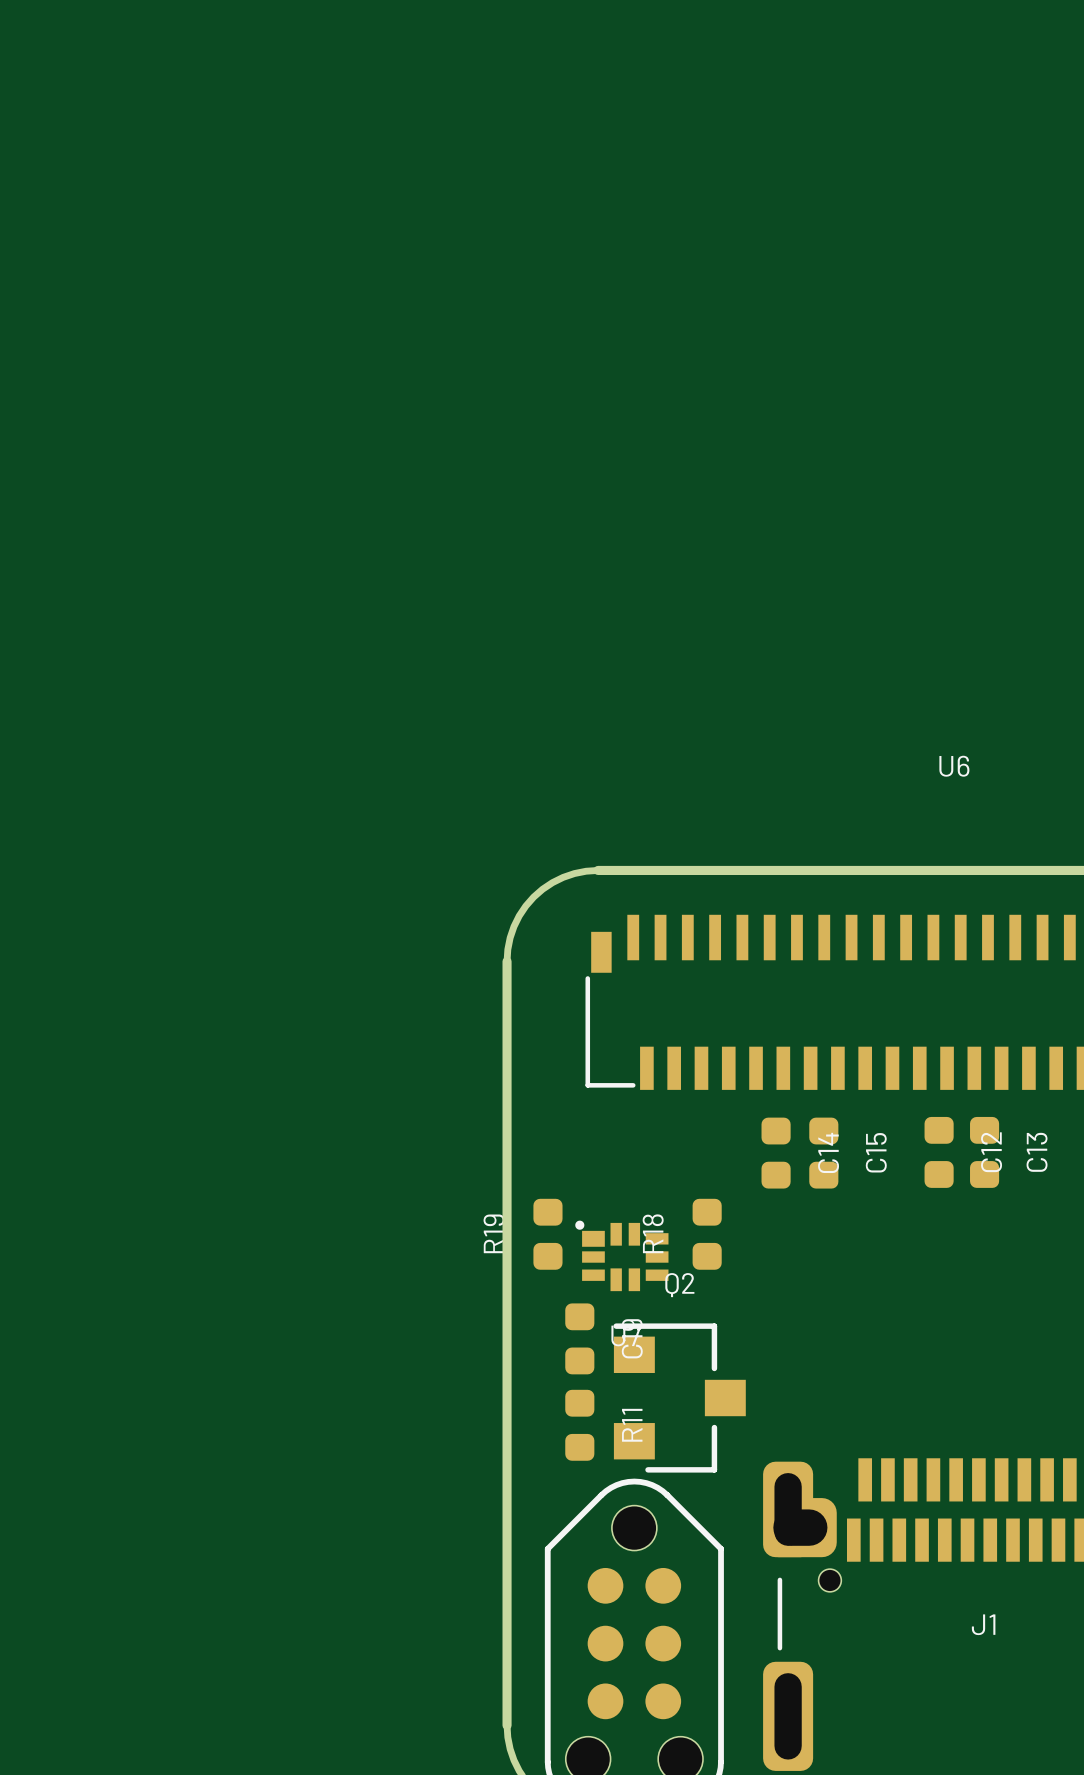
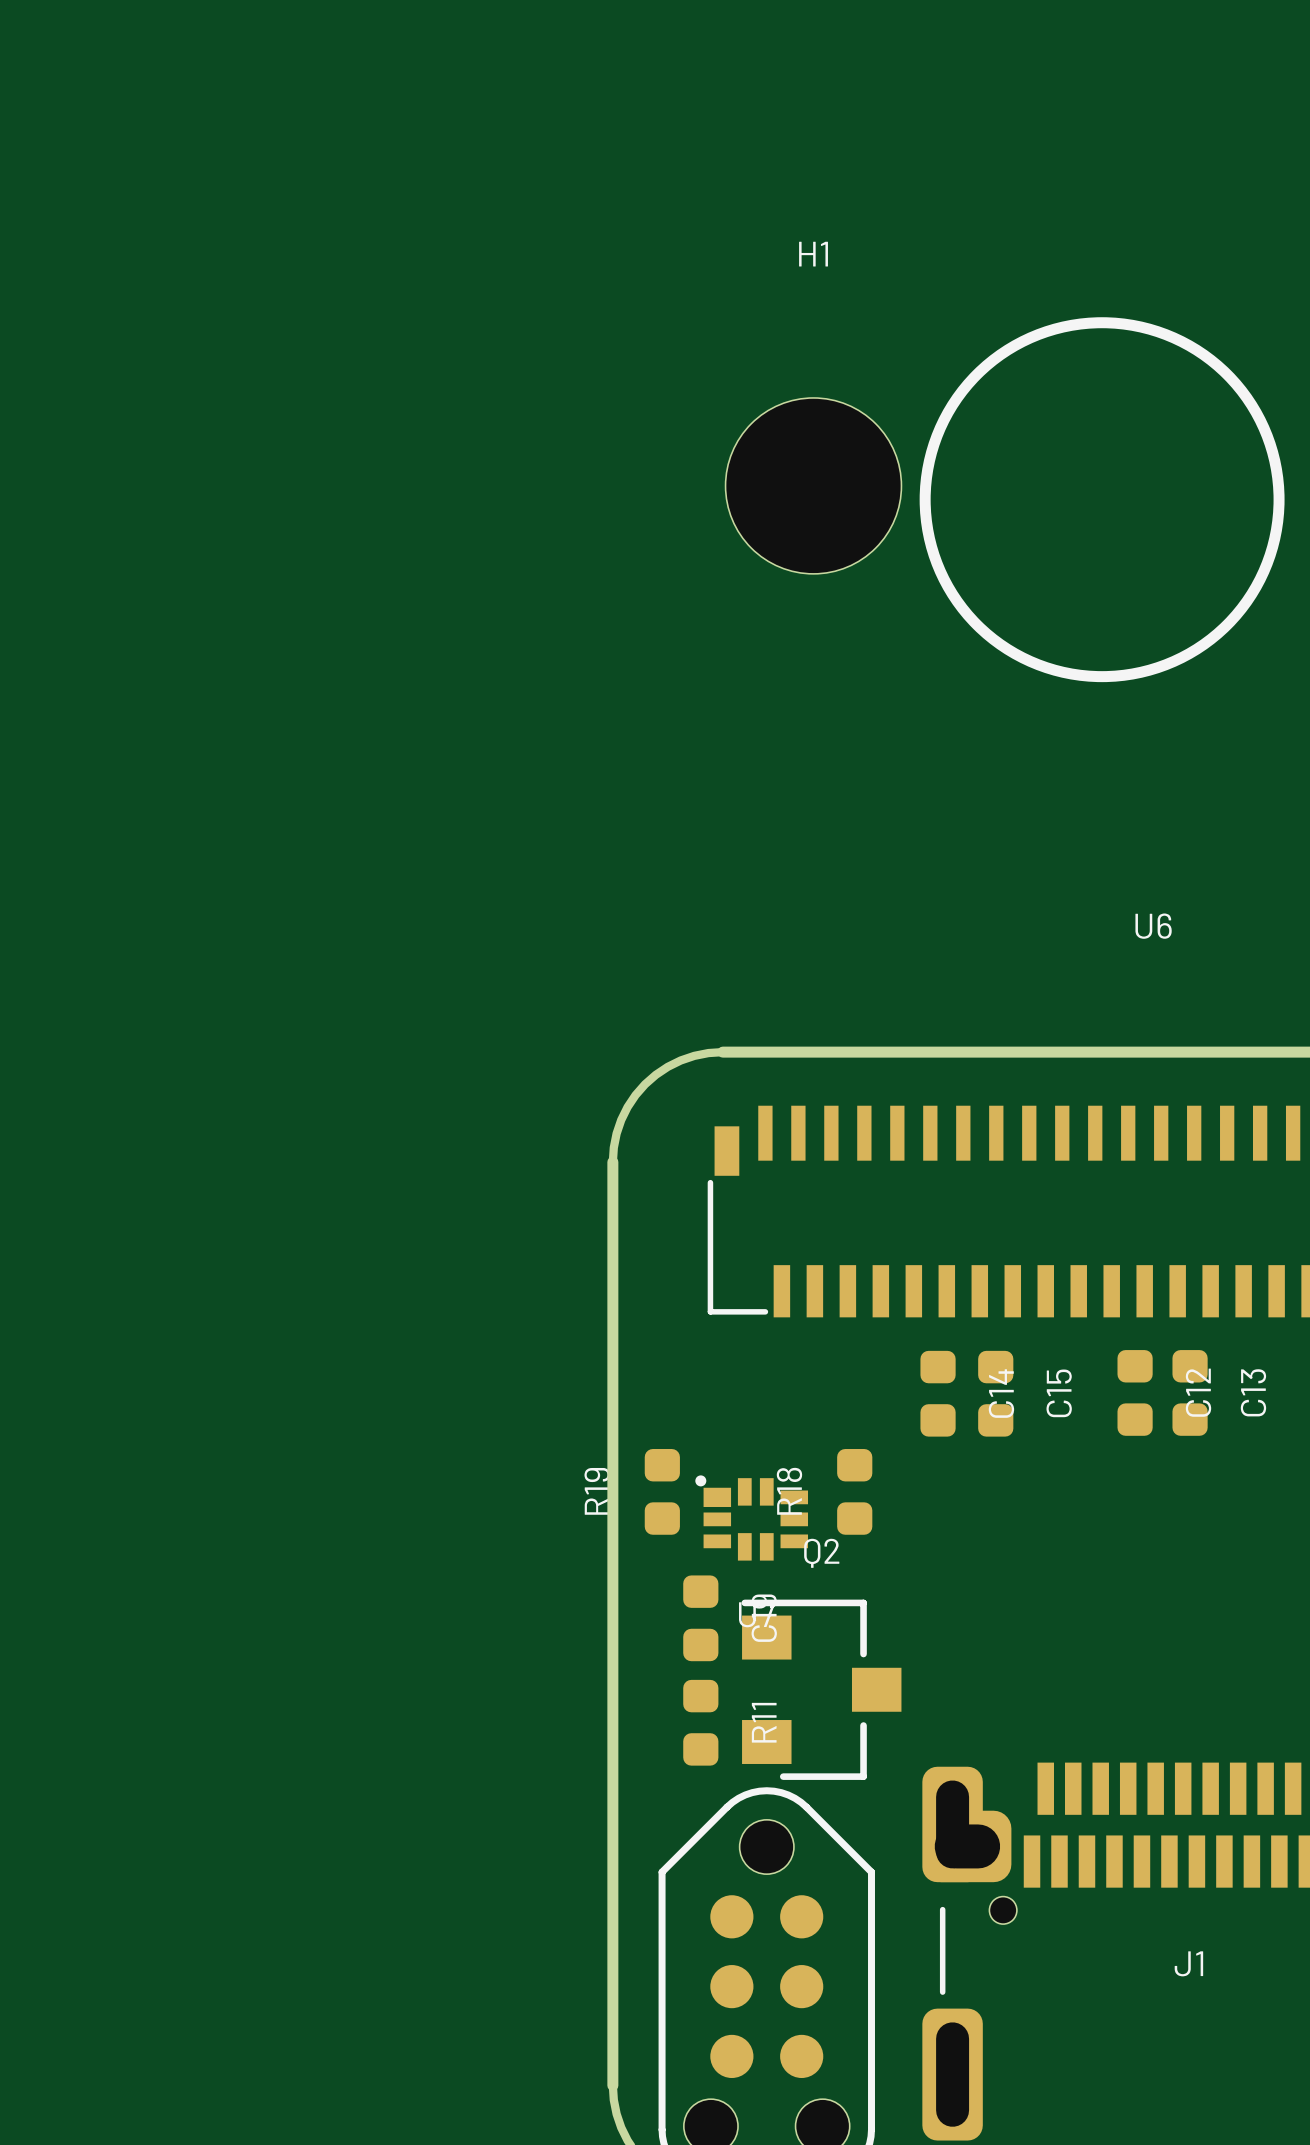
drawing: none -> [919, 317, 1285, 683]
H1: none -> (813, 485)

